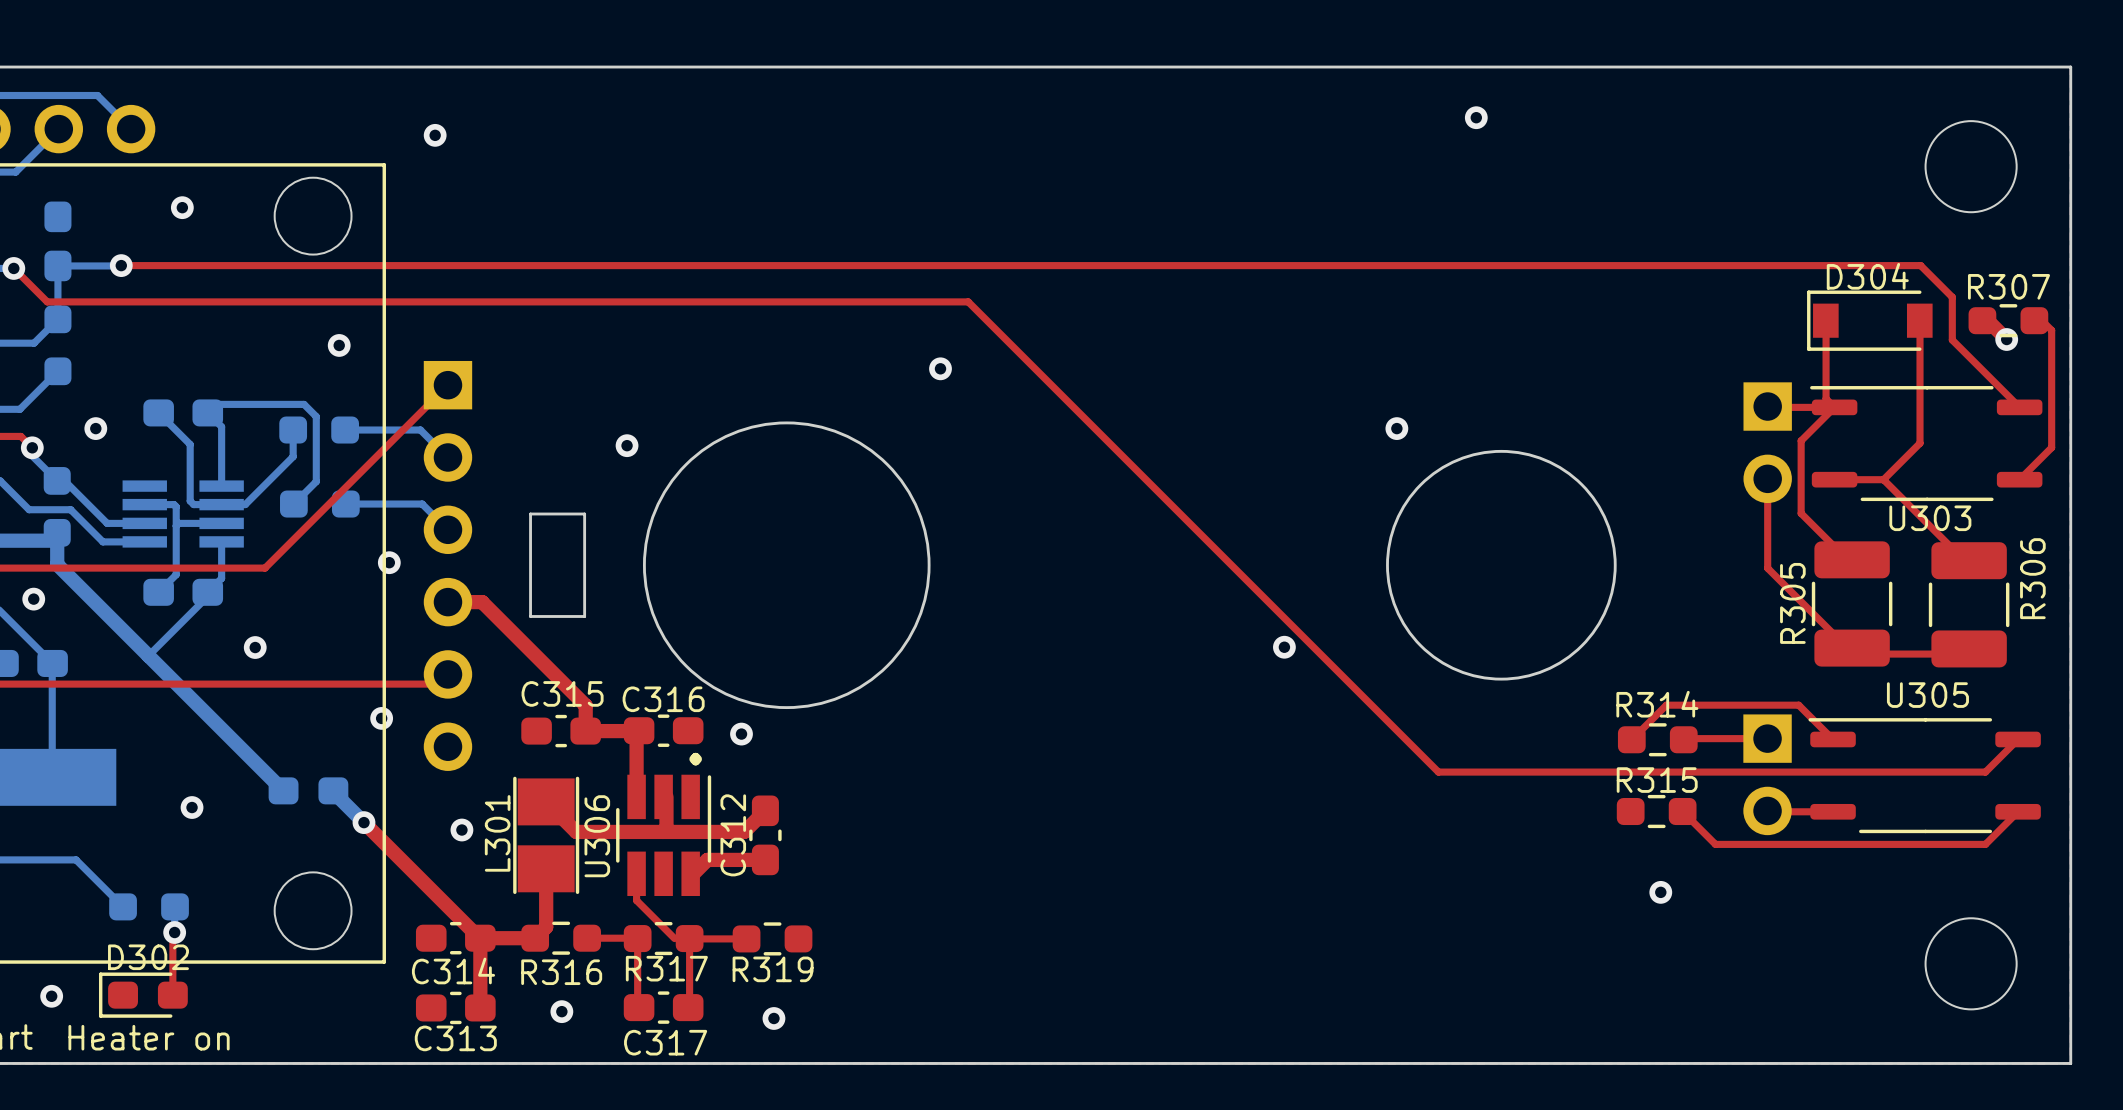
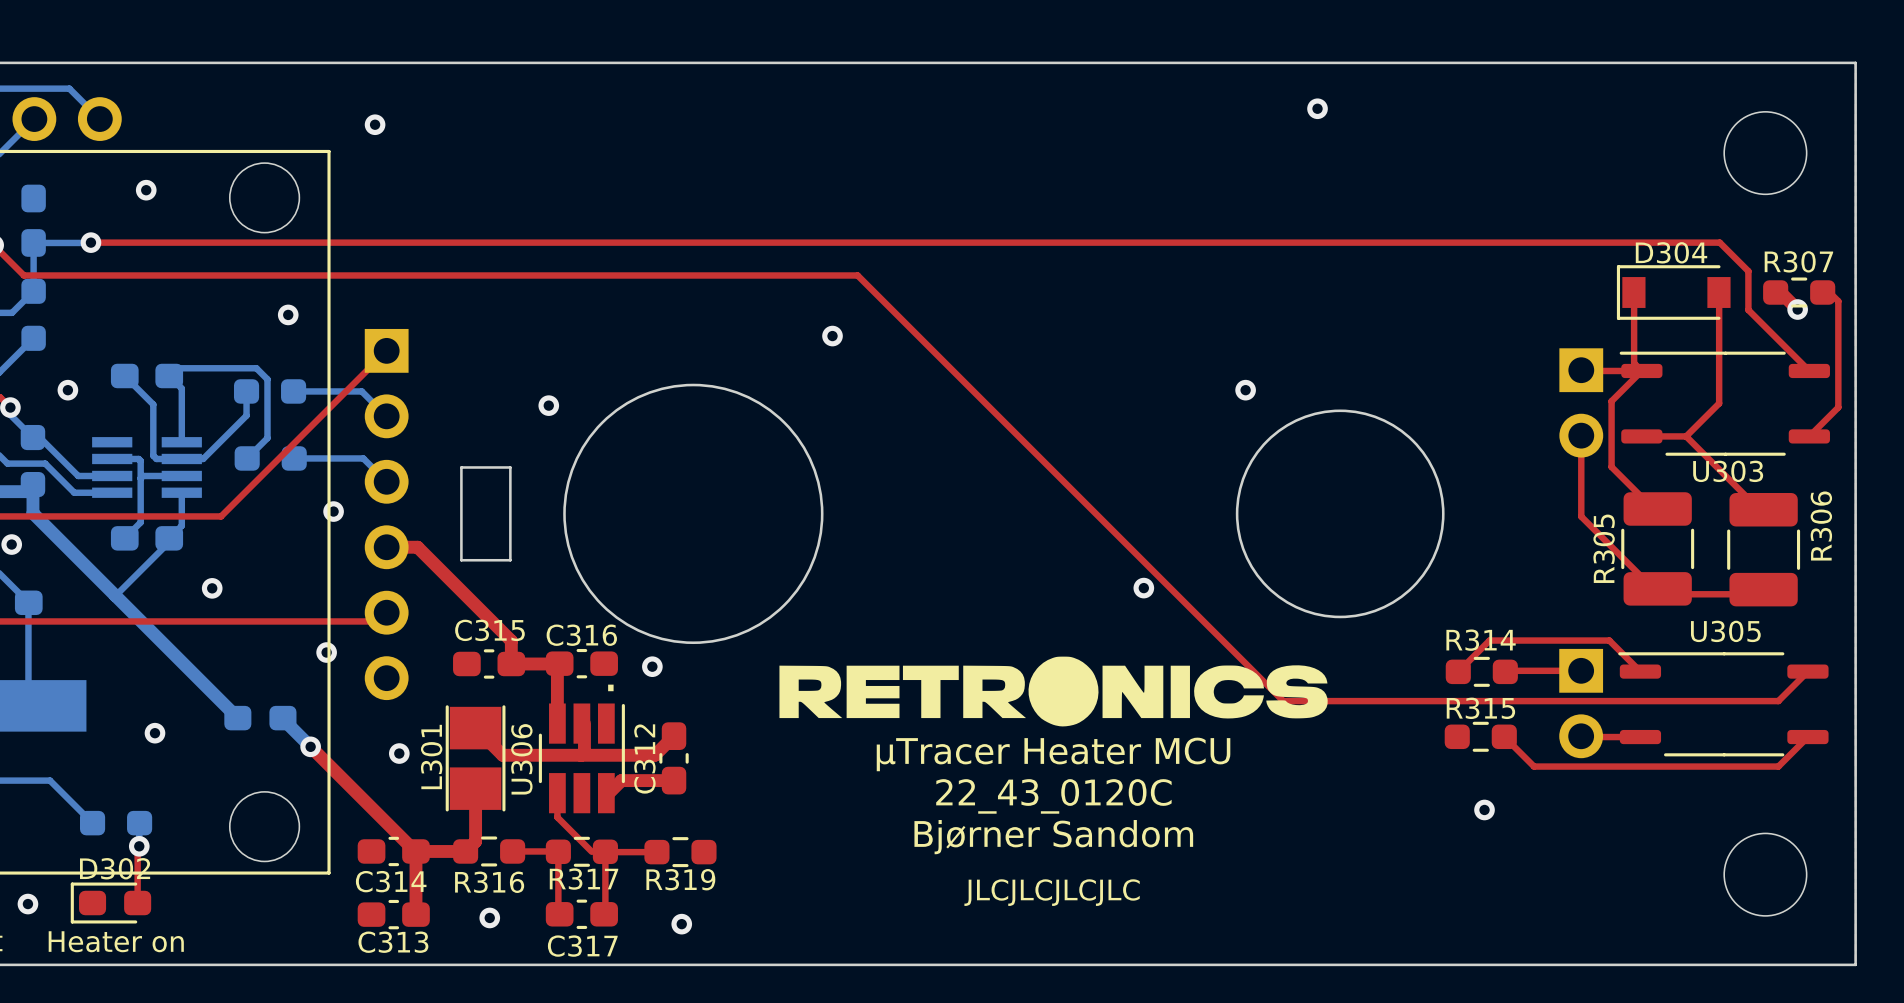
drawing: none -> [779, 656, 1328, 727]
text: none -> µTracer Heater MCU (1053, 754)
text: none -> 22_43_0120C (1053, 796)
text: none -> Bjørner Sandom (1053, 837)
text: none -> JLCJLCJLCJLC (1052, 892)

